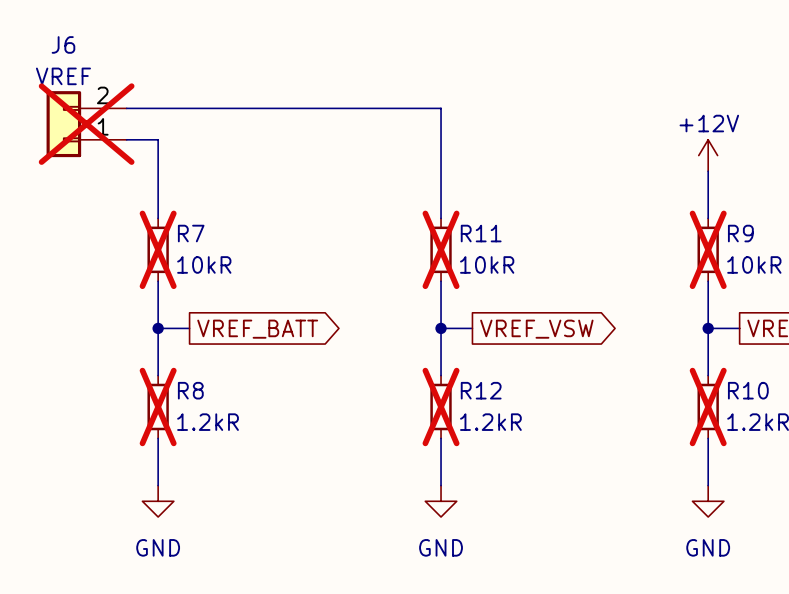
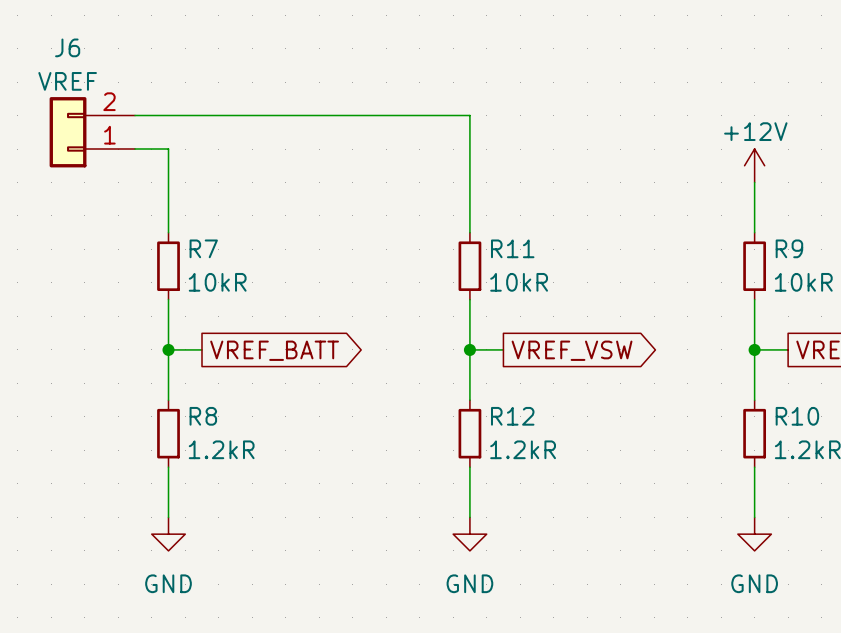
J6 do-not-place cross: (86, 124) -> none
R7 do-not-place cross: (158, 249) -> none
R11 do-not-place cross: (441, 249) -> none
R9 do-not-place cross: (708, 249) -> none
R8 do-not-place cross: (158, 407) -> none
R12 do-not-place cross: (441, 407) -> none
R10 do-not-place cross: (708, 407) -> none

